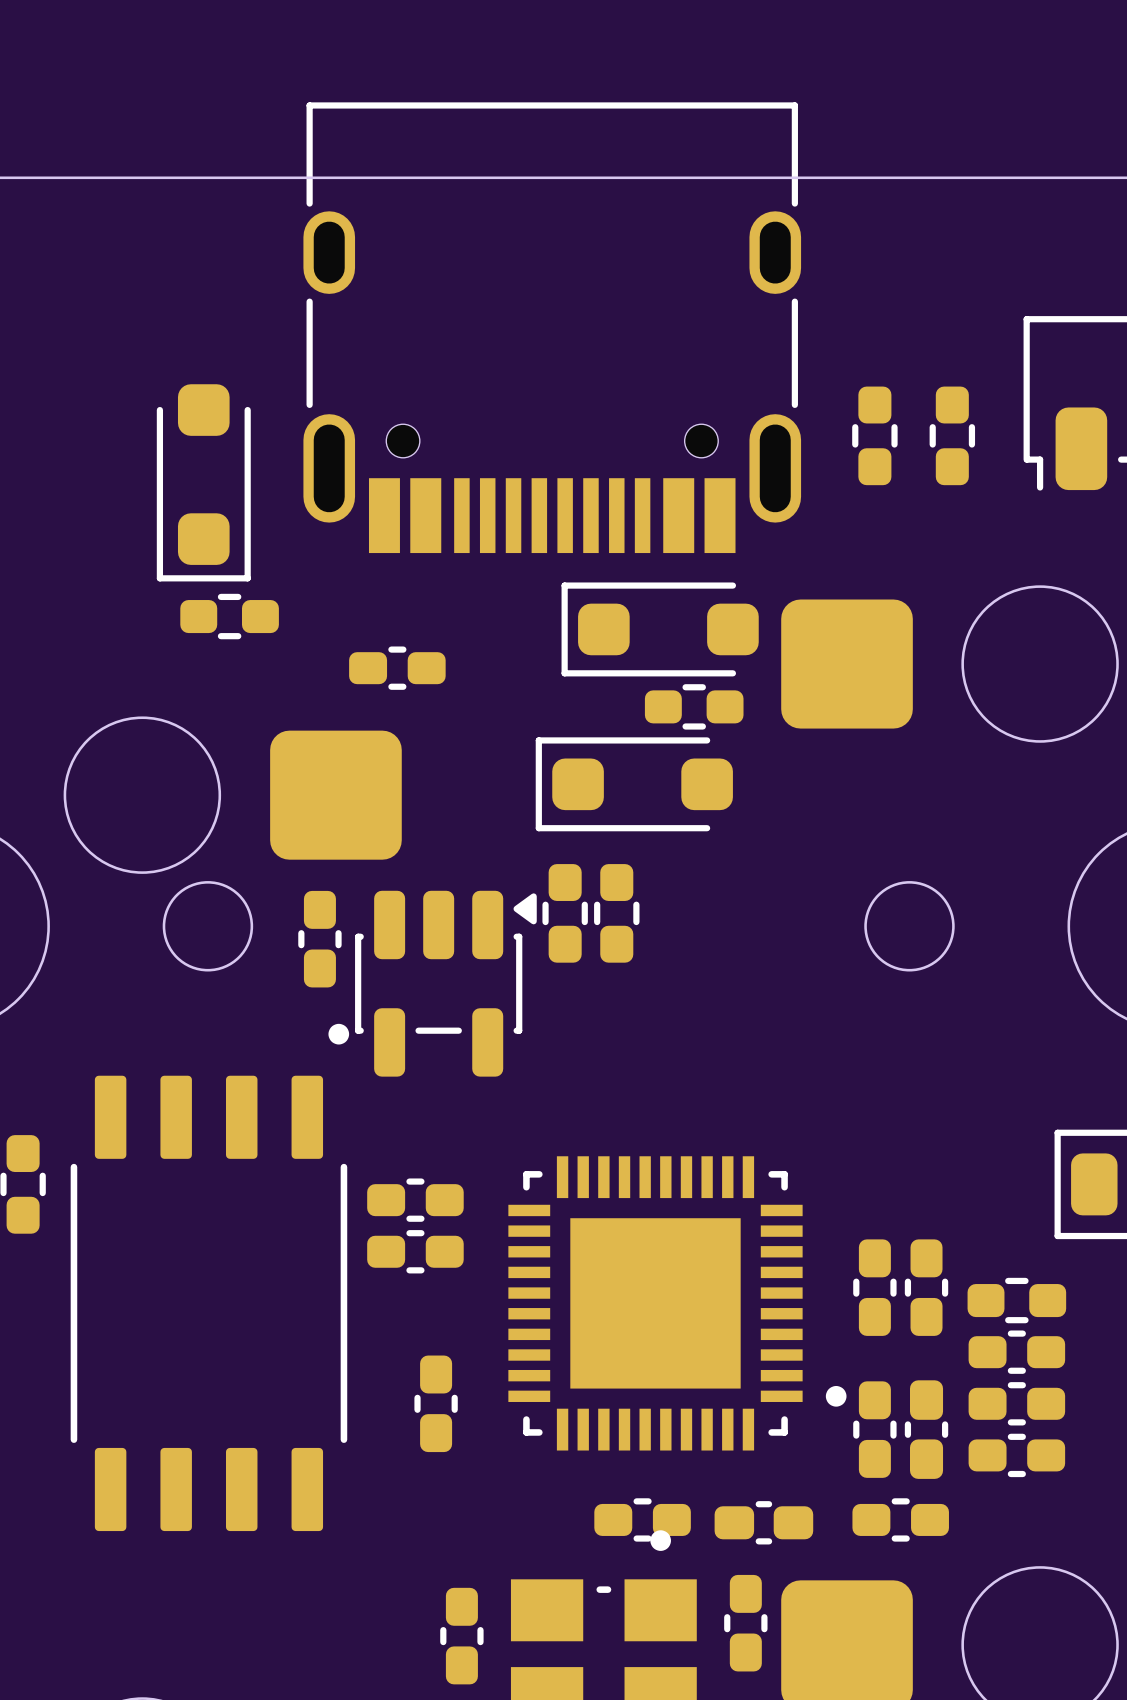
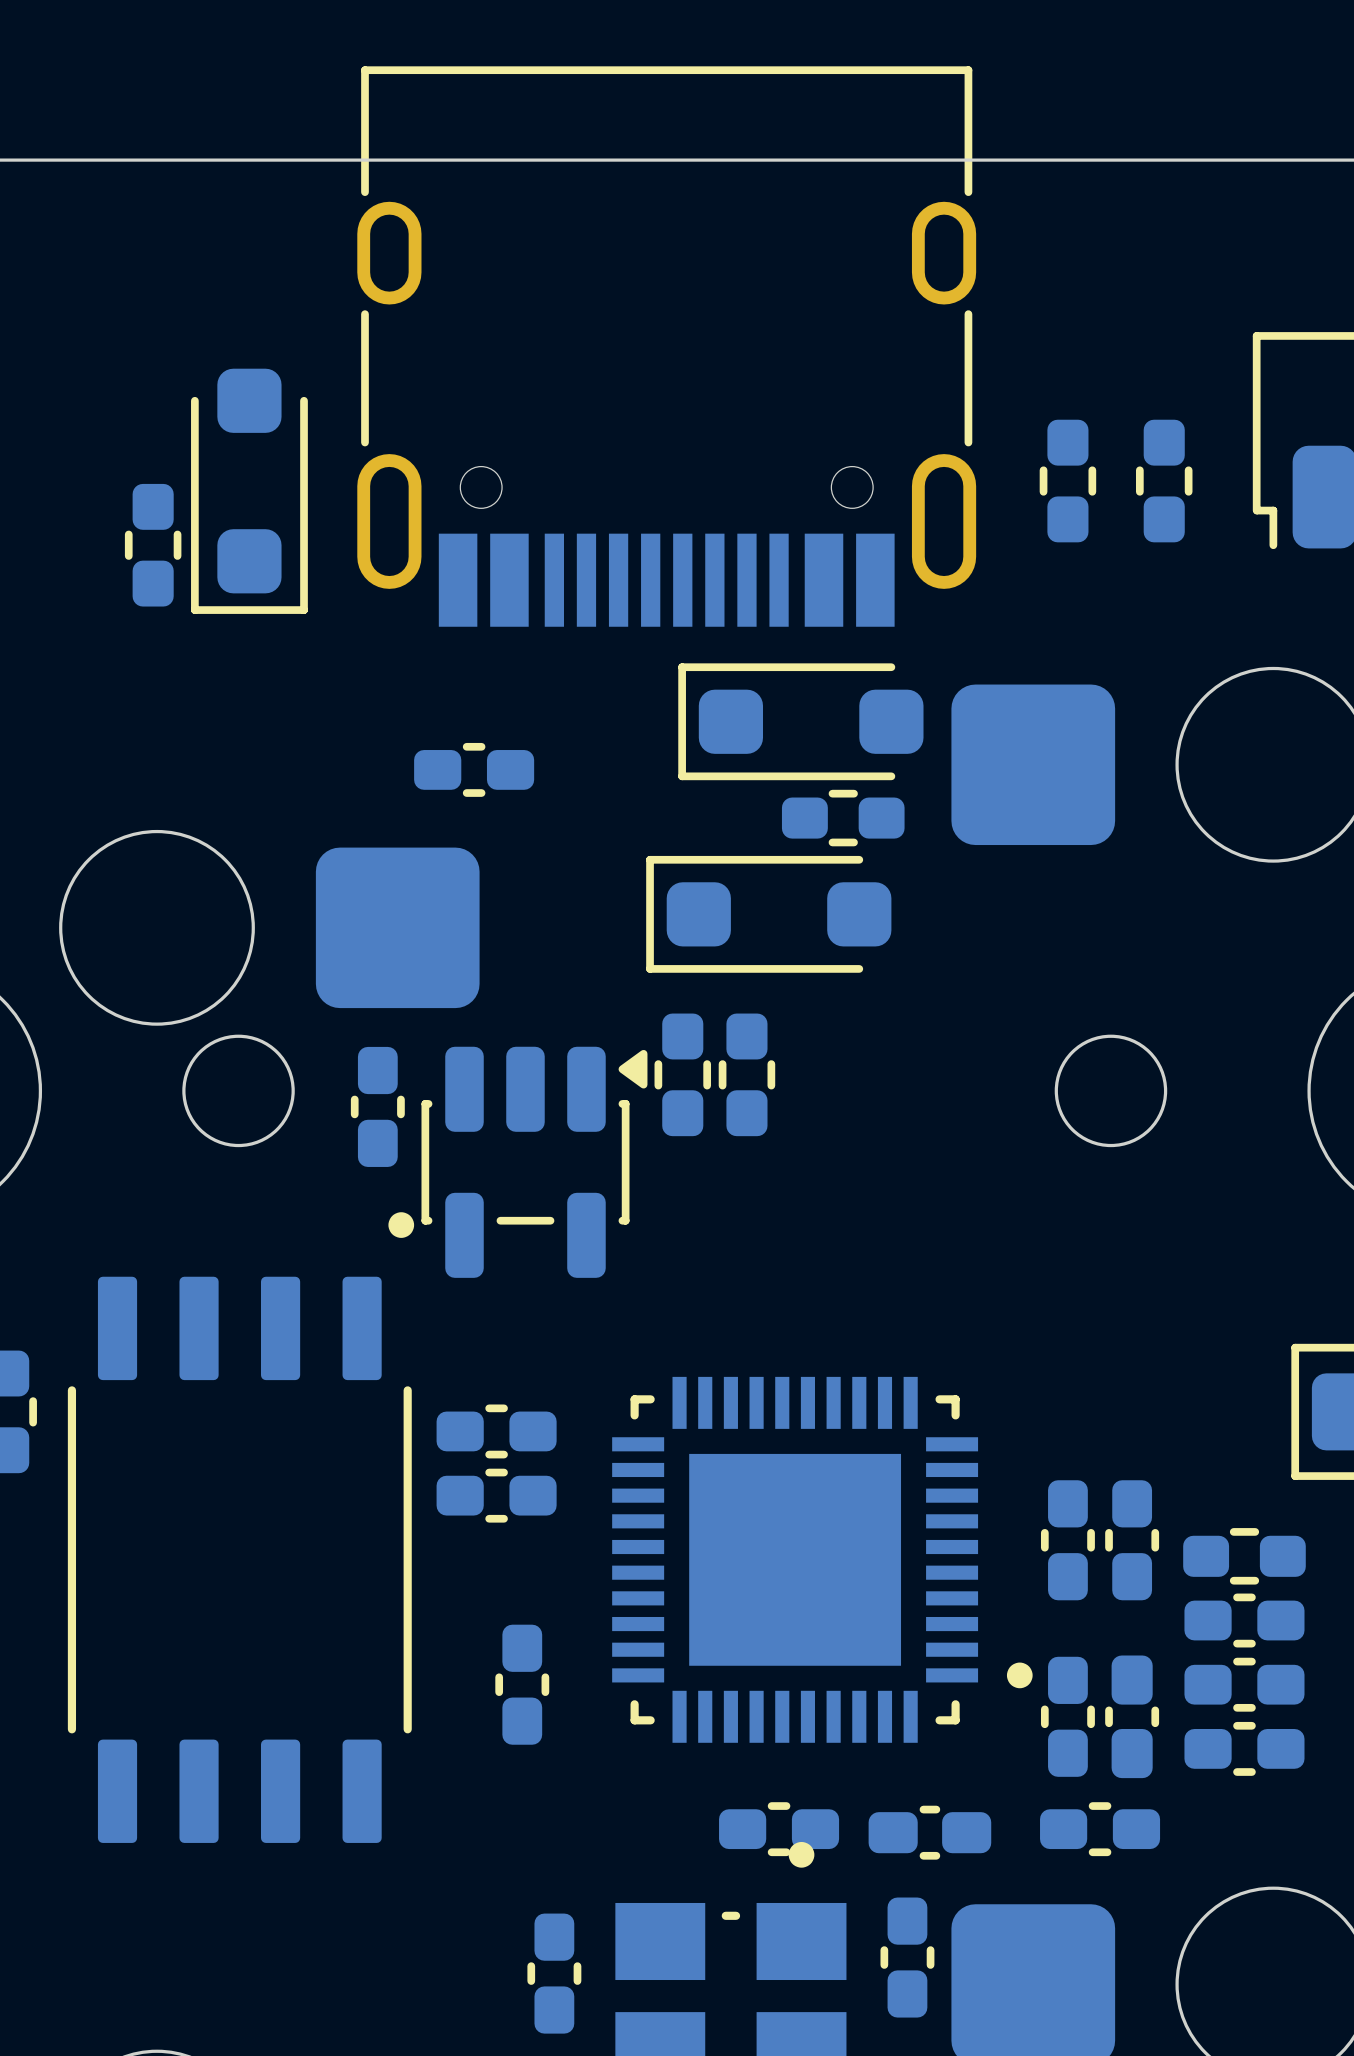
part position: (203, 482) -> (249, 491)
part rotation: 0° (229, 616) -> 90° clockwise (153, 545)
part position: (229, 616) -> (153, 545)

